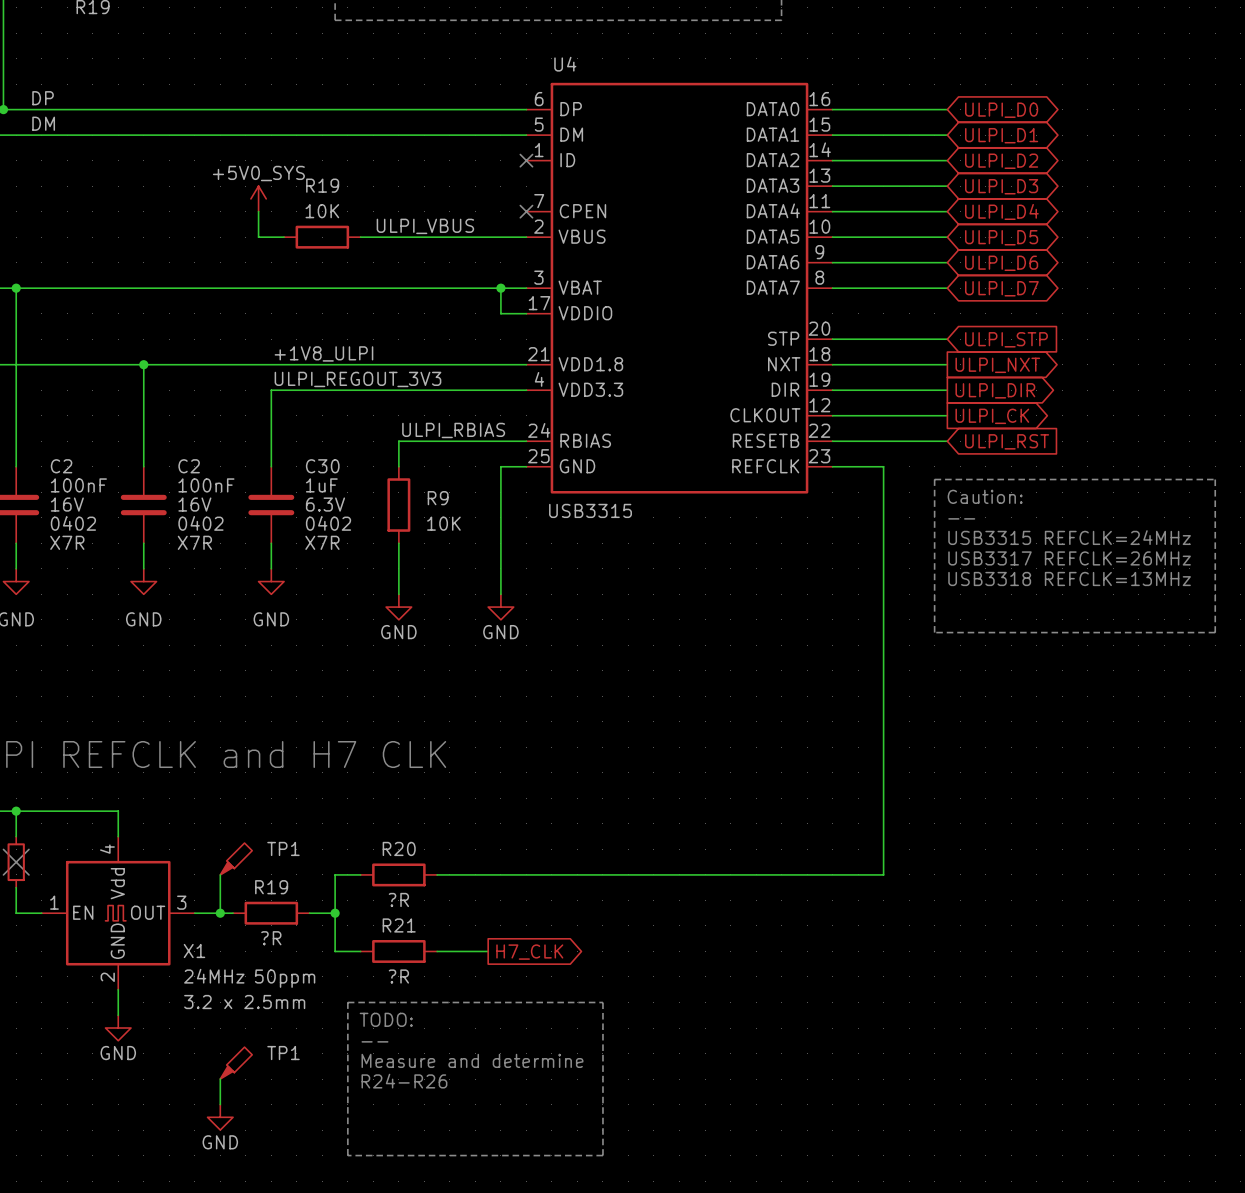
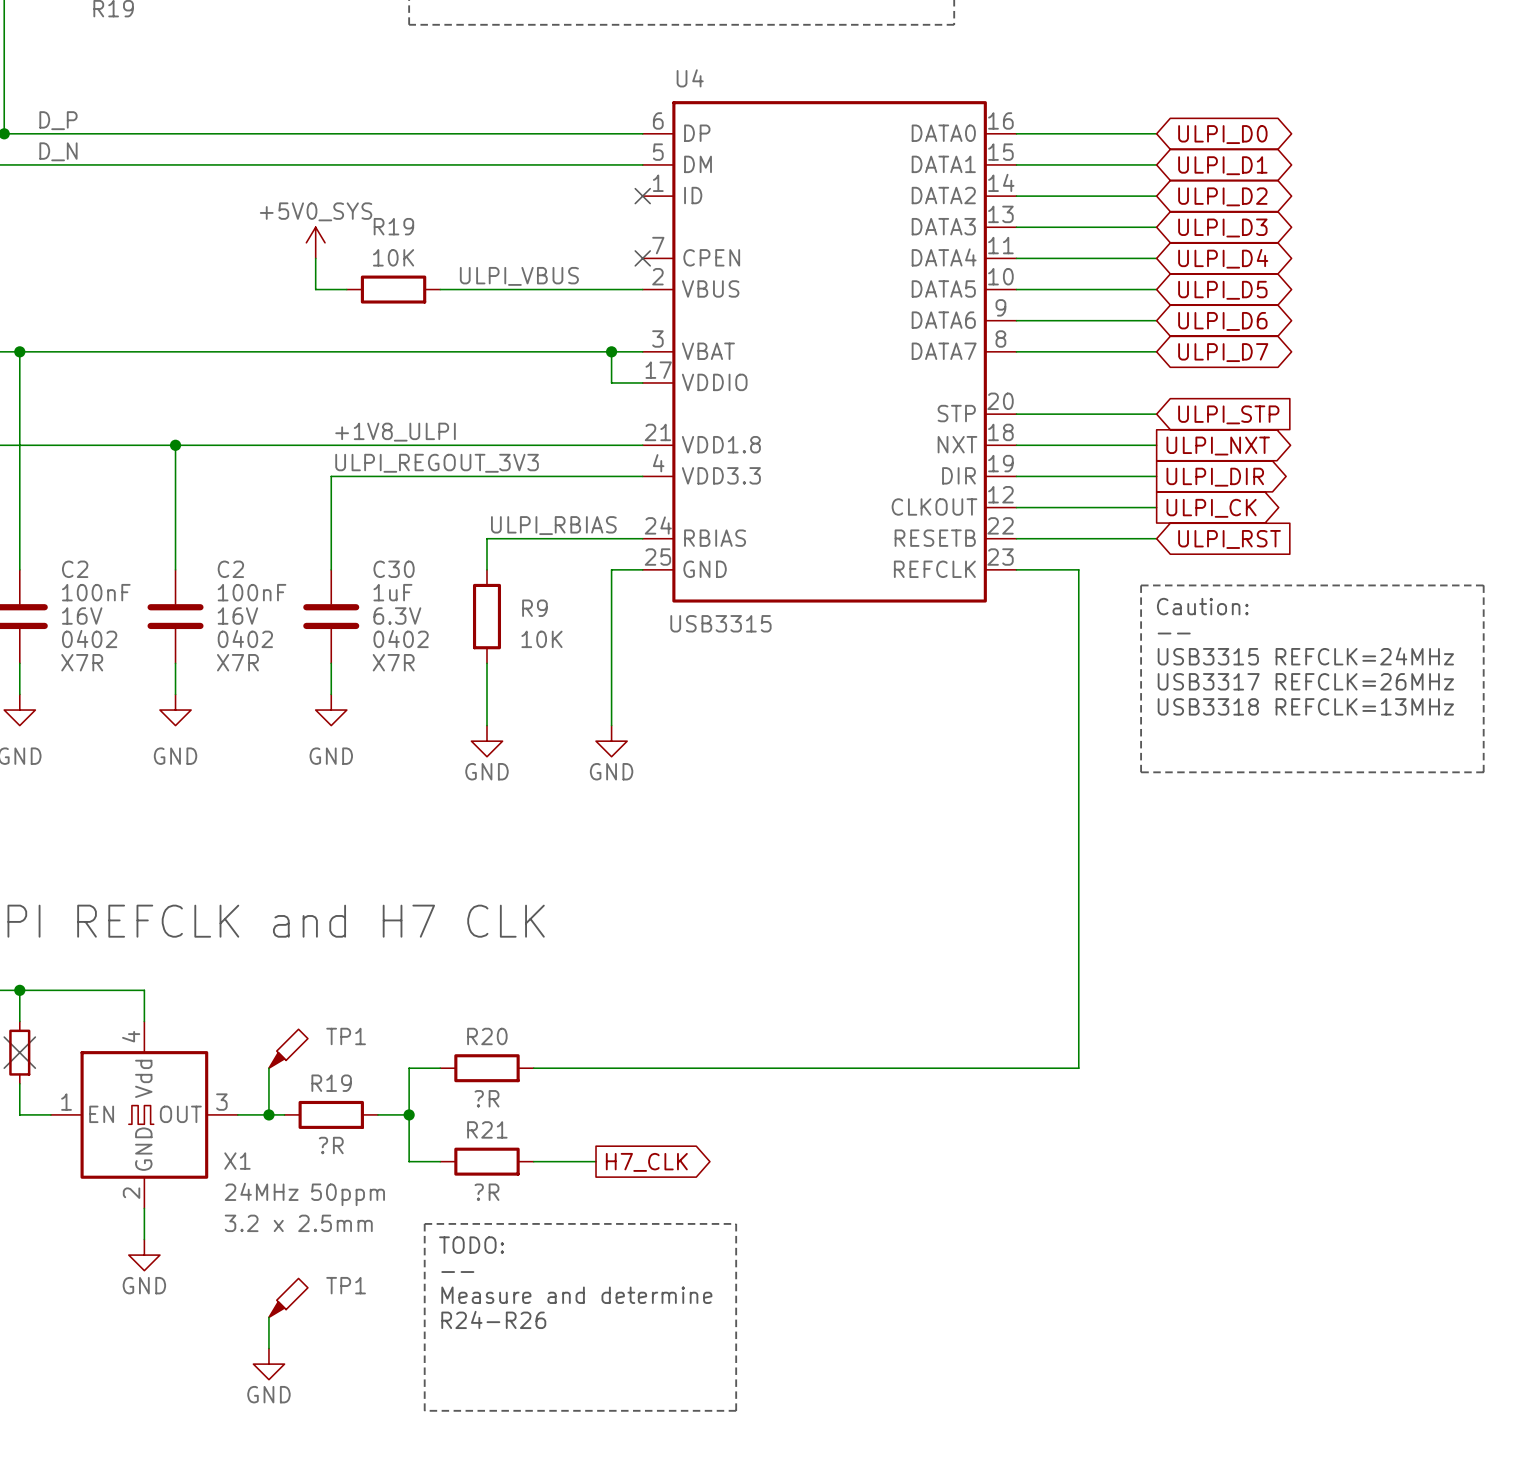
label: DP (43, 98) -> D_P (58, 120)
label: DM (43, 123) -> D_N (58, 151)

